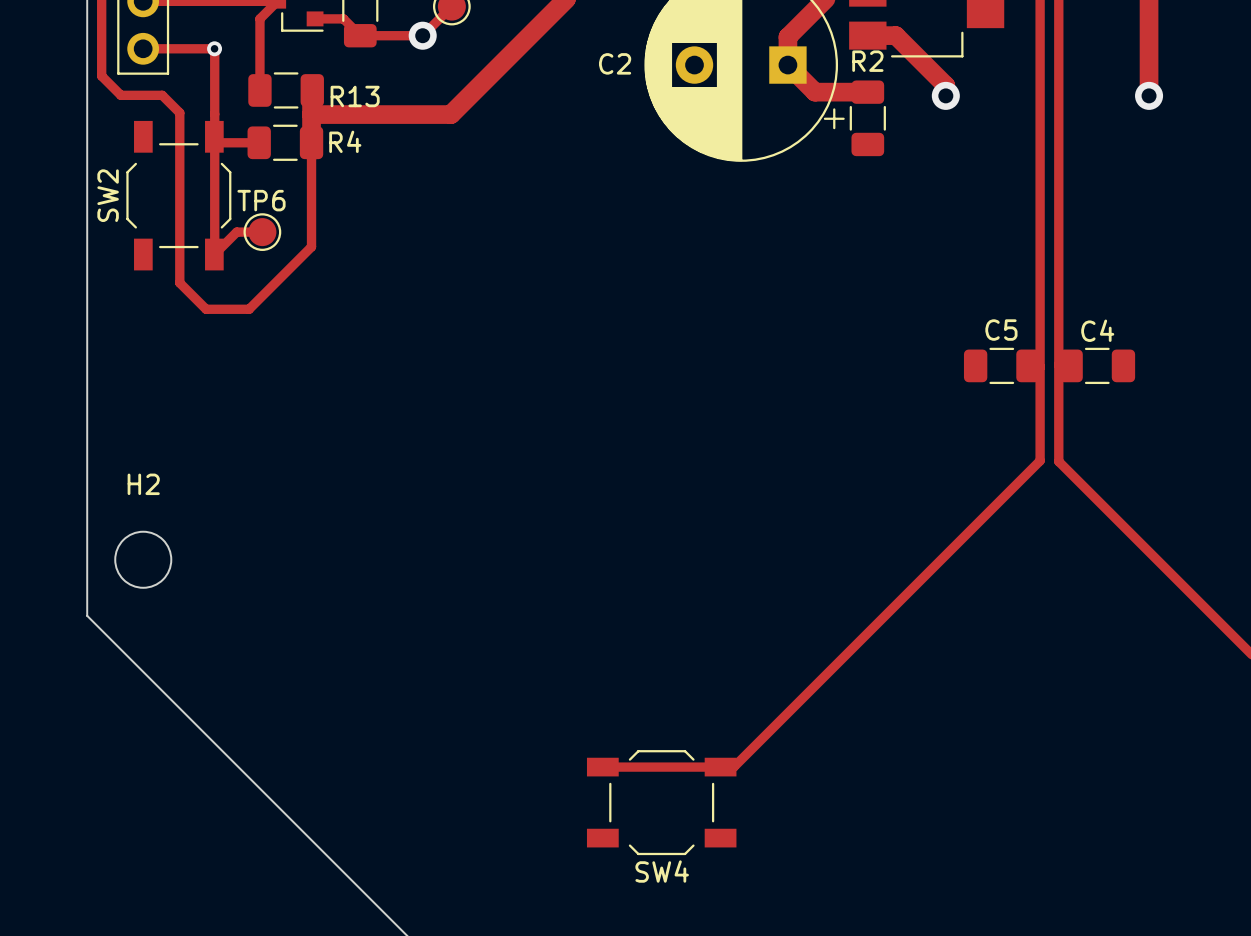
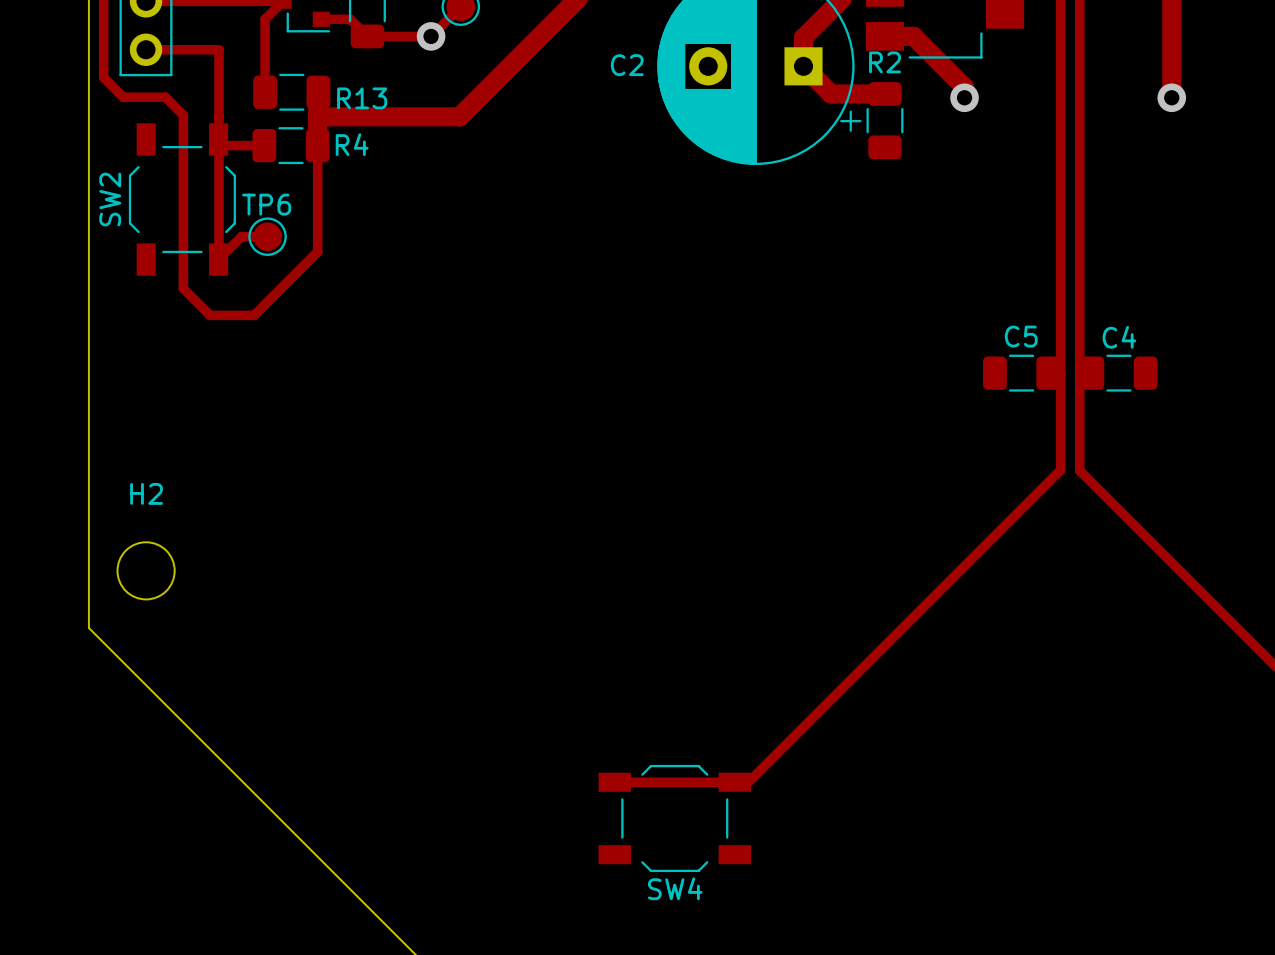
via: (214, 48) -> none

